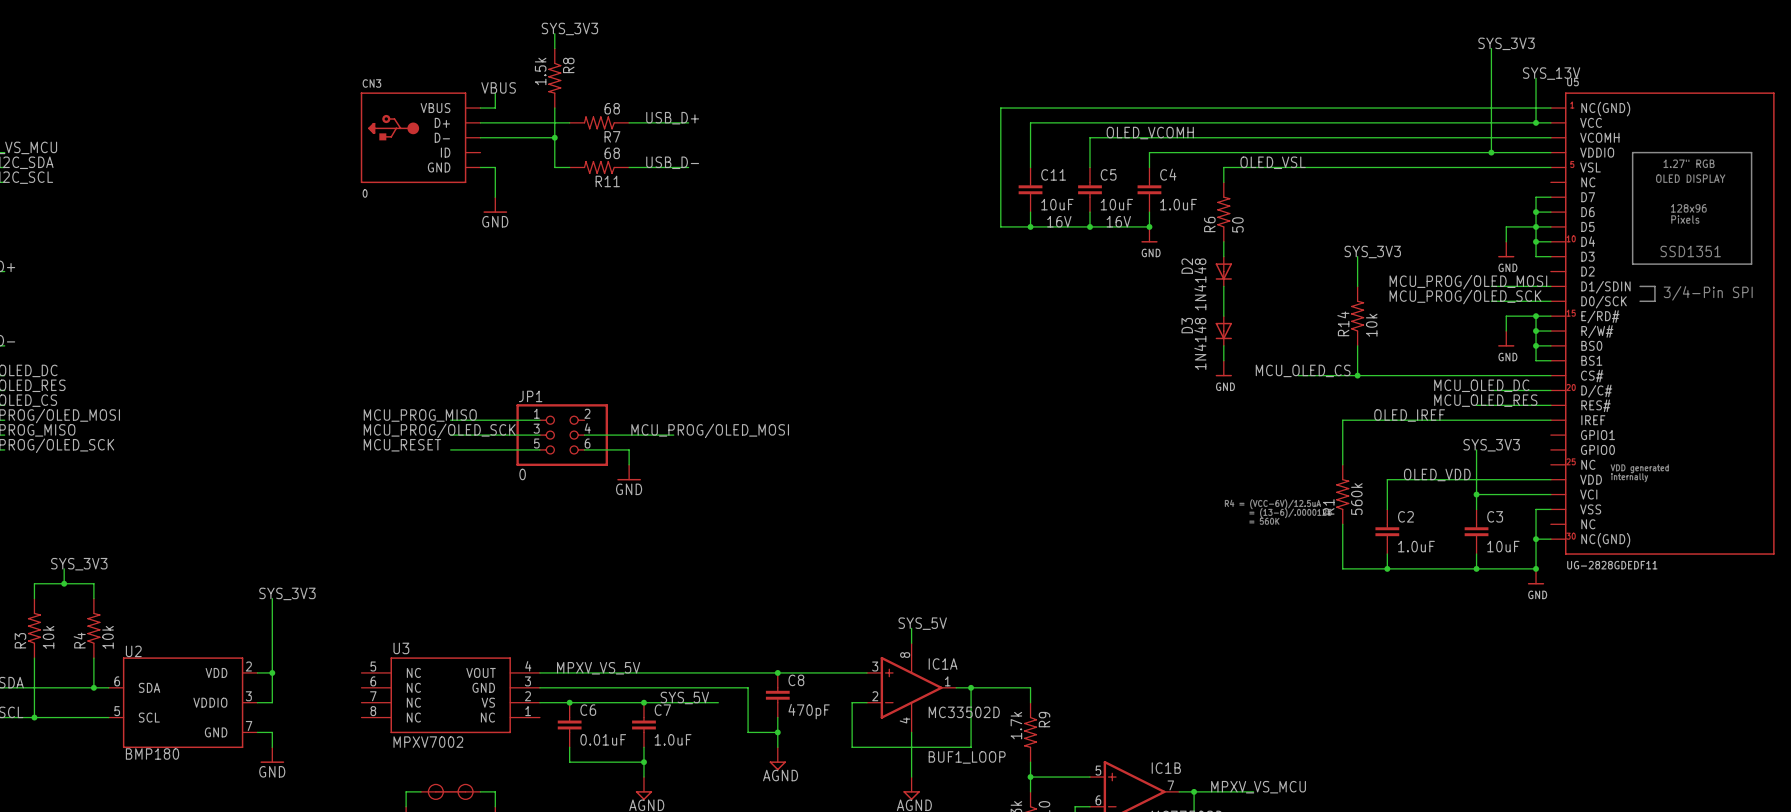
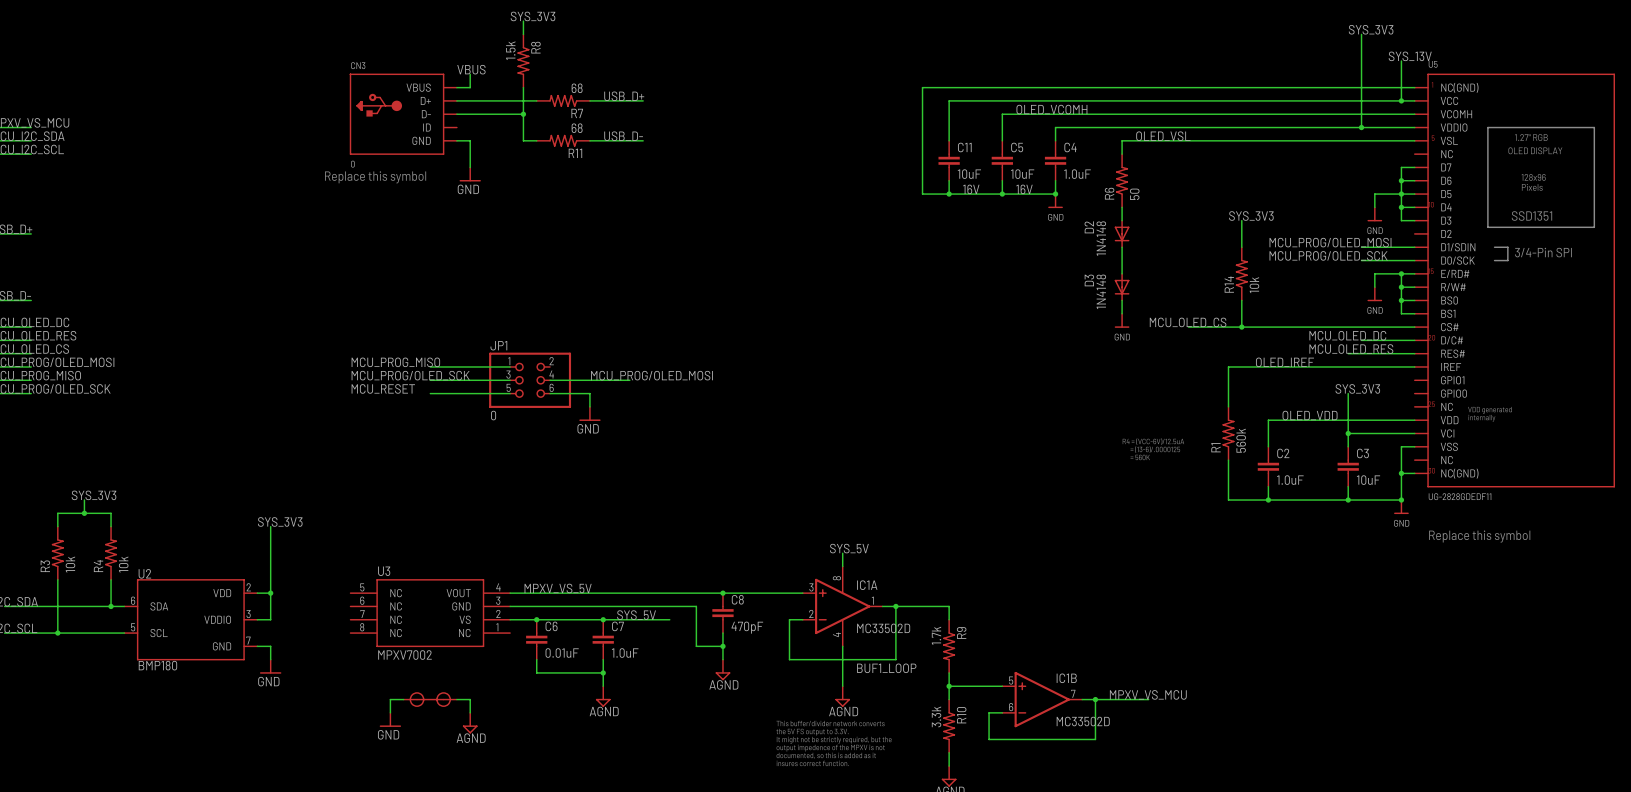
text: none -> Replace this symbol (375, 177)
text: none -> Replace this symbol (1479, 536)

